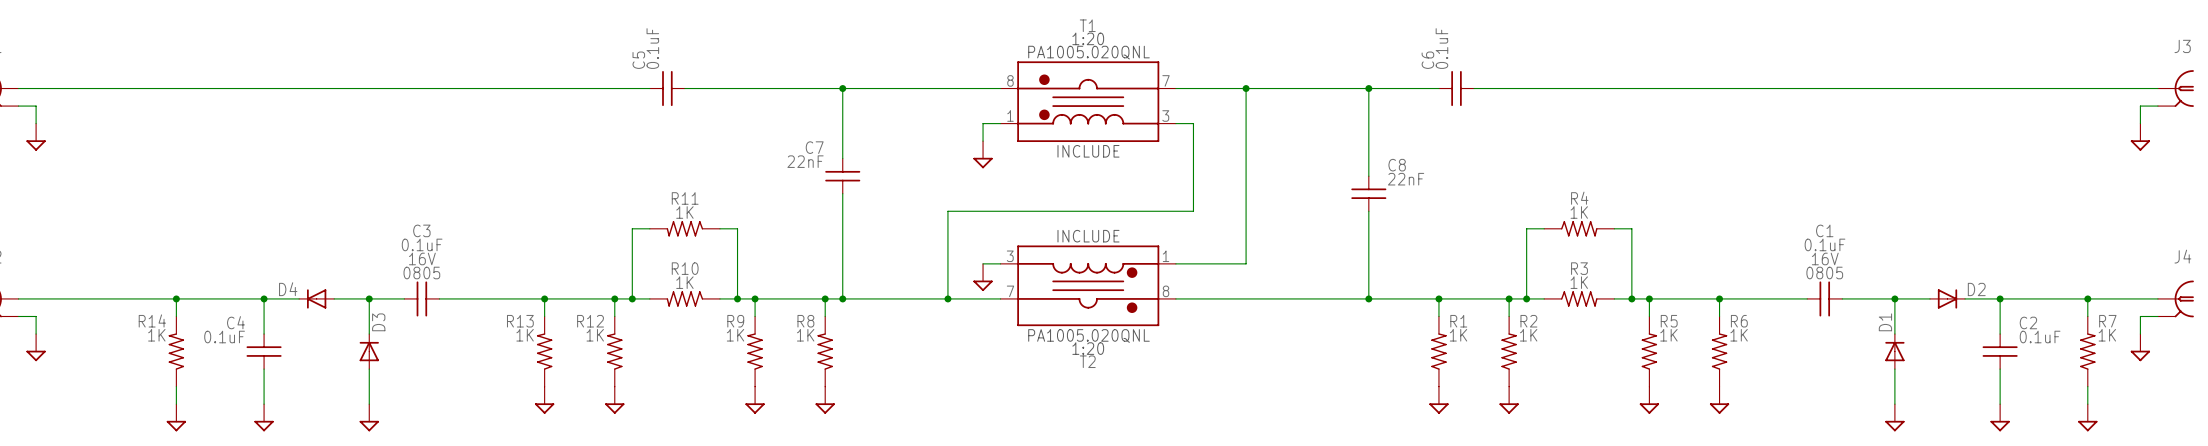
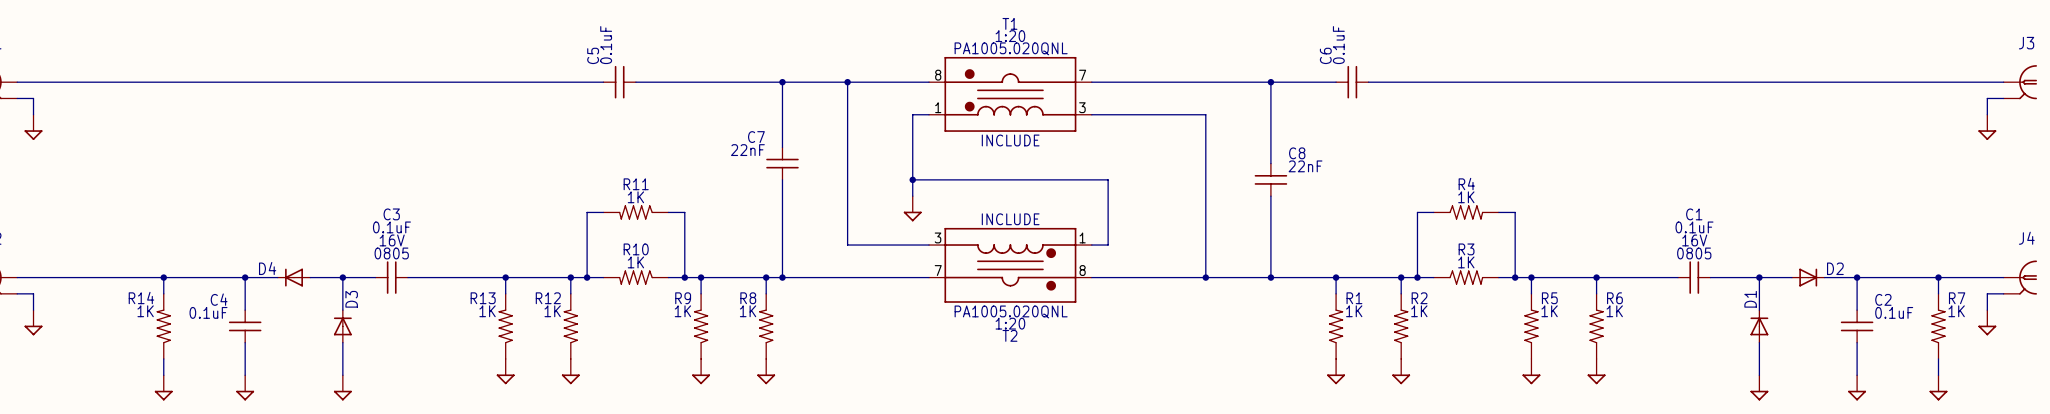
wire: none -> (847, 82) (847, 245) (912, 245)
junction: none -> (847, 82)
wire: (1246, 88) (1246, 263) (1193, 263) -> (1108, 196) (1108, 245)
junction: (1246, 88) -> none
wire: (1193, 123) (1193, 193) -> (1108, 114) (1205, 114) (1205, 277)
wire: none -> (912, 131) (912, 196)
power symbol: (983, 154) -> none
wire: none -> (912, 179) (1108, 179)
junction: none -> (912, 179)
wire: (1193, 211) (947, 211) (947, 298) -> none
power symbol: none -> (912, 208)
power symbol: (983, 277) -> none
junction: (947, 298) -> none
junction: none -> (1205, 277)

